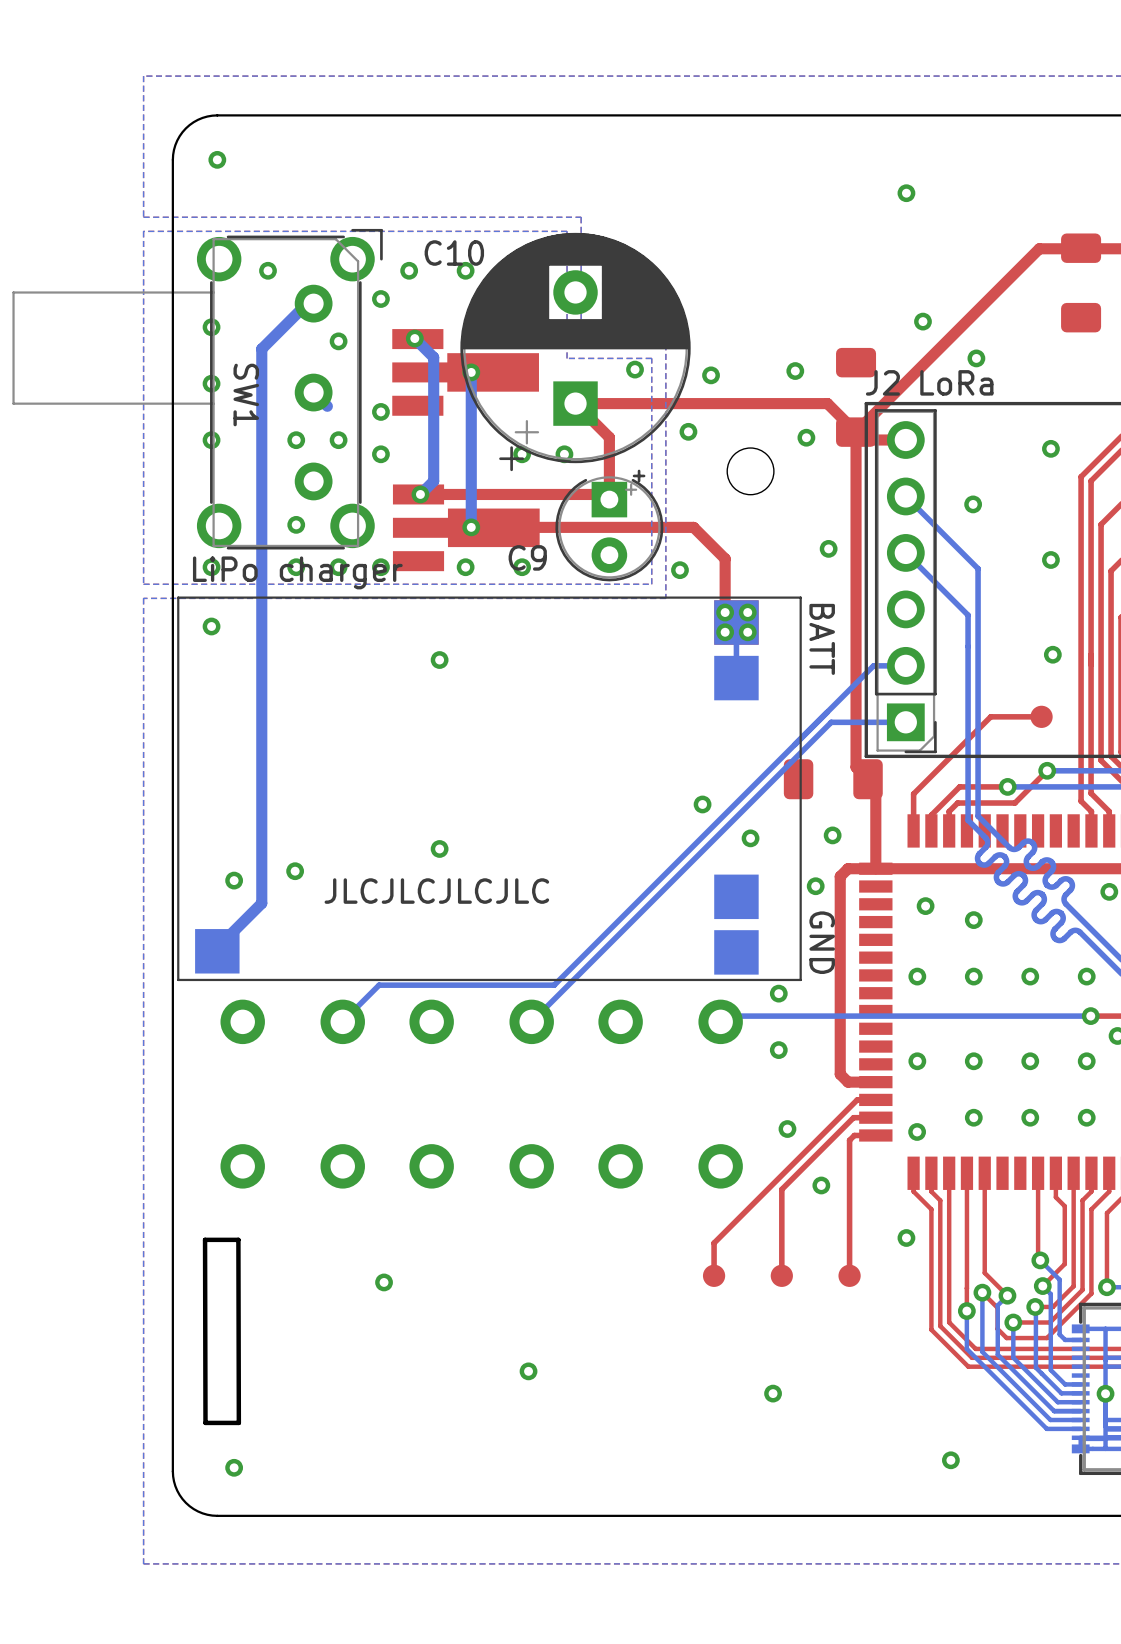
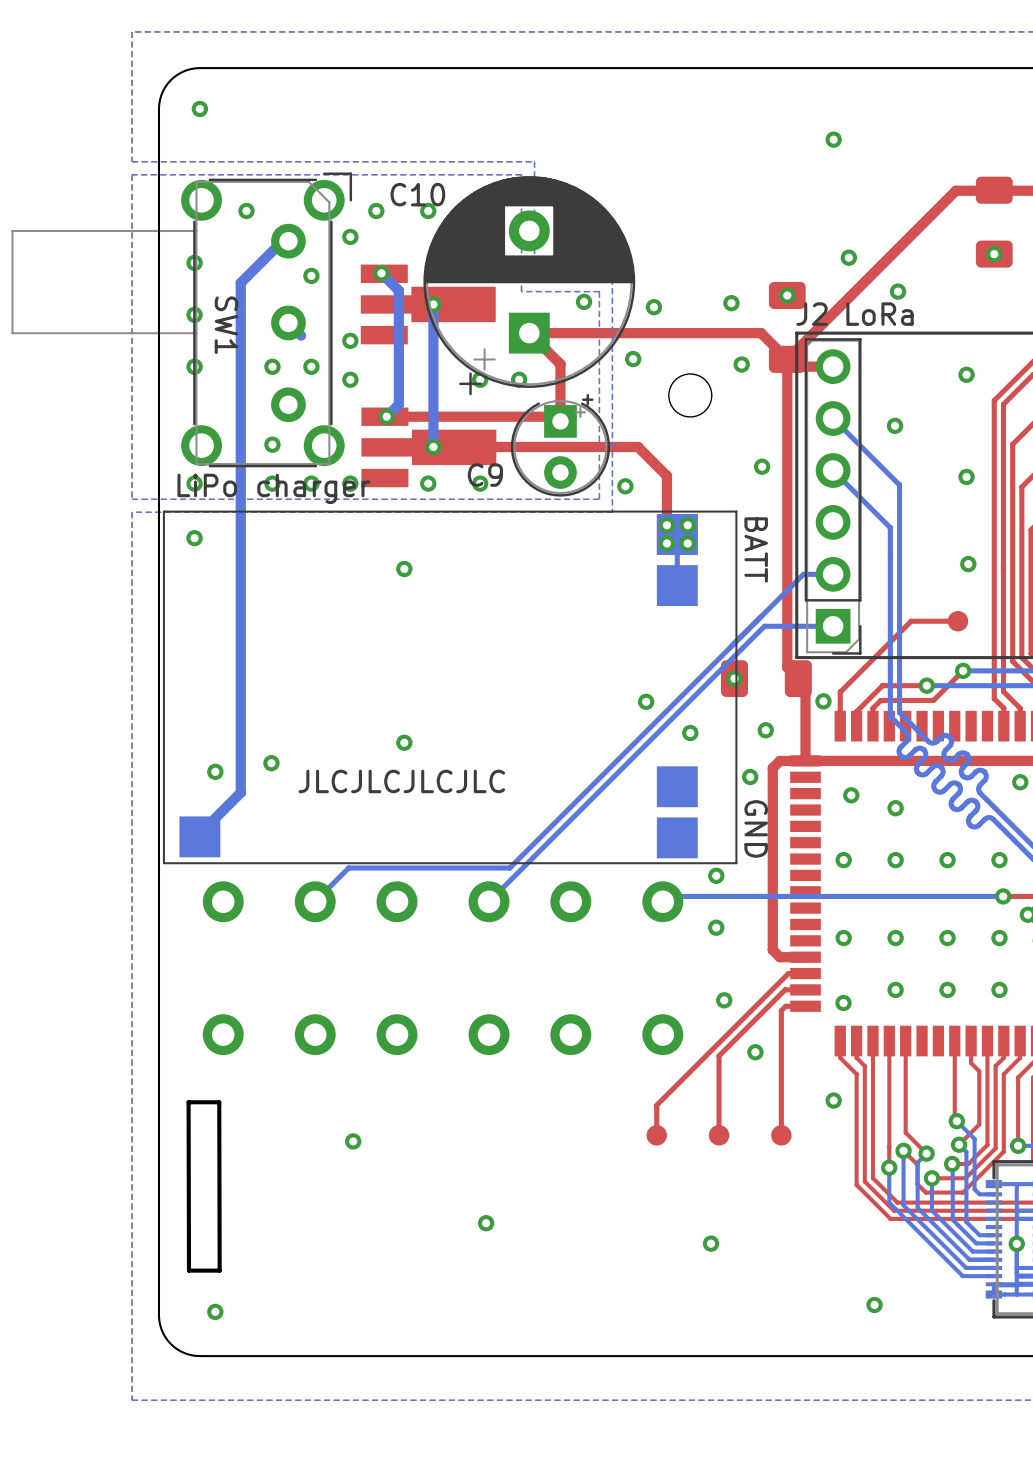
via: none -> (994, 254)
via: none -> (787, 295)
via: none -> (734, 678)
via: none -> (823, 701)

